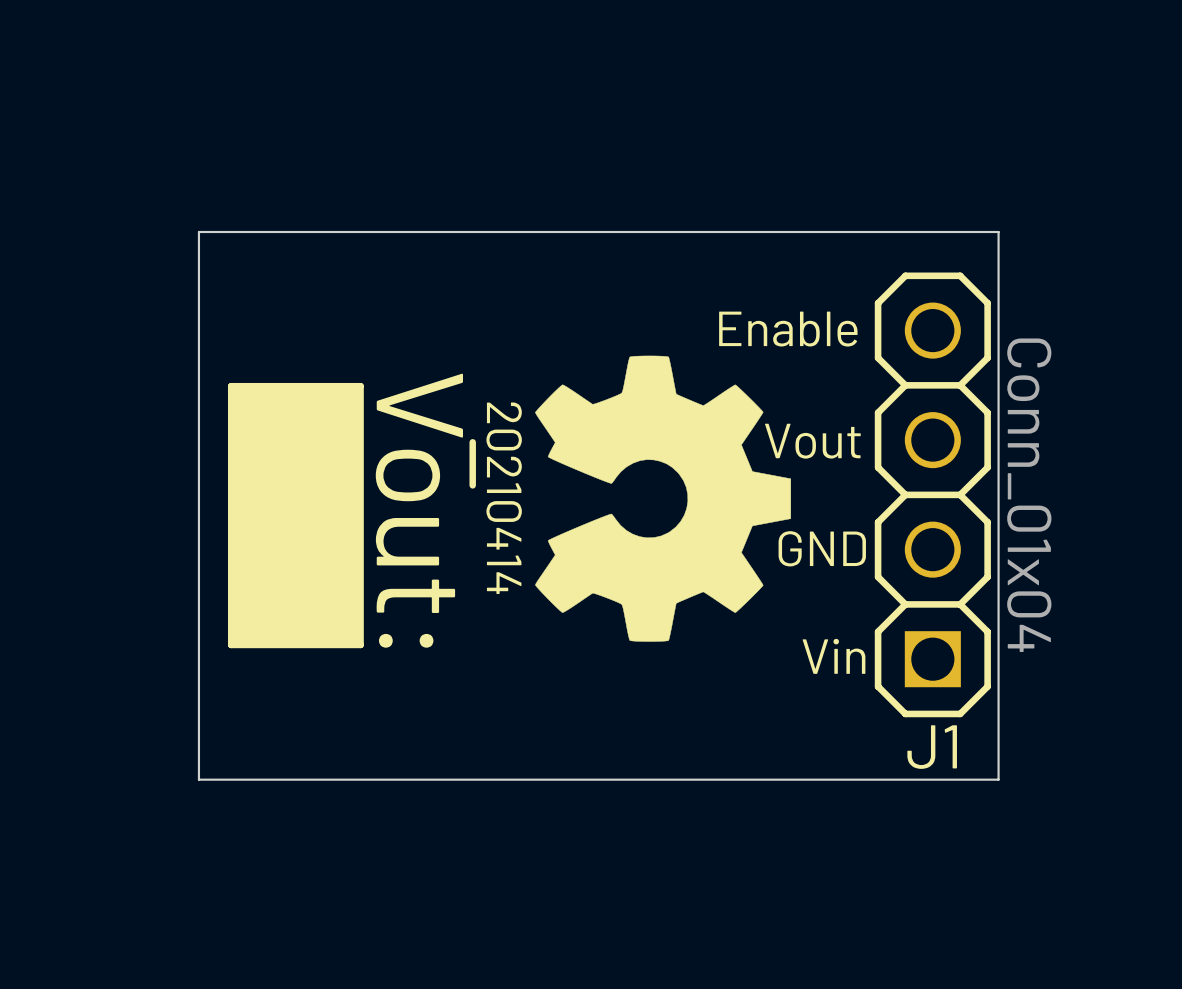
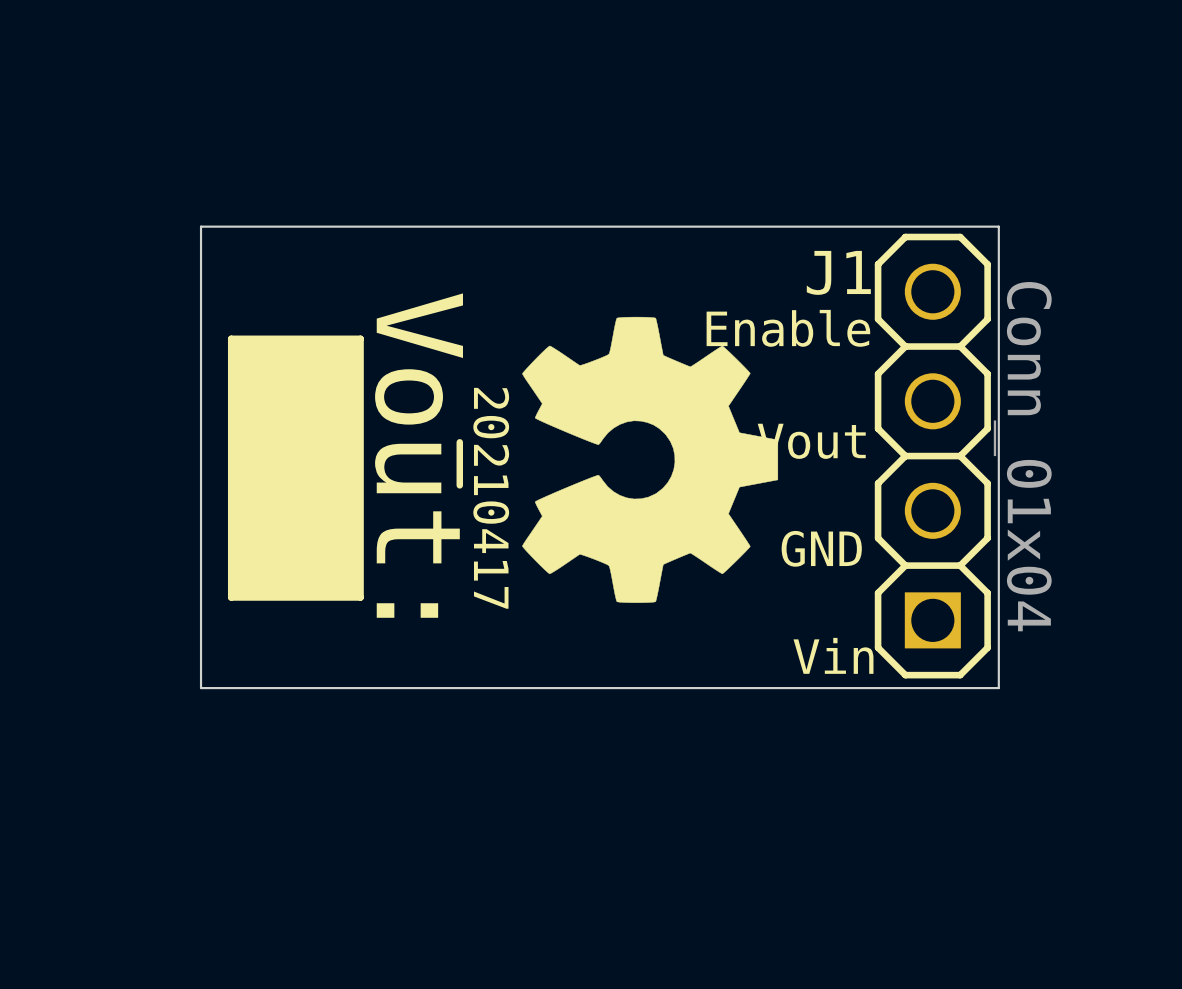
board edge: (998, 231) (998, 779) (198, 779) (198, 231) (998, 231) -> (998, 226) (998, 688) (201, 688) (201, 226) (998, 226)
drawing shape: [469, 402, 522, 594] -> [456, 387, 510, 609]
J1 position: (932, 494) -> (932, 456)
drawing position: (663, 498) -> (650, 459)
drawing position: (295, 515) -> (295, 468)
J1 name position: J1 (932, 747) -> J1 (838, 272)

